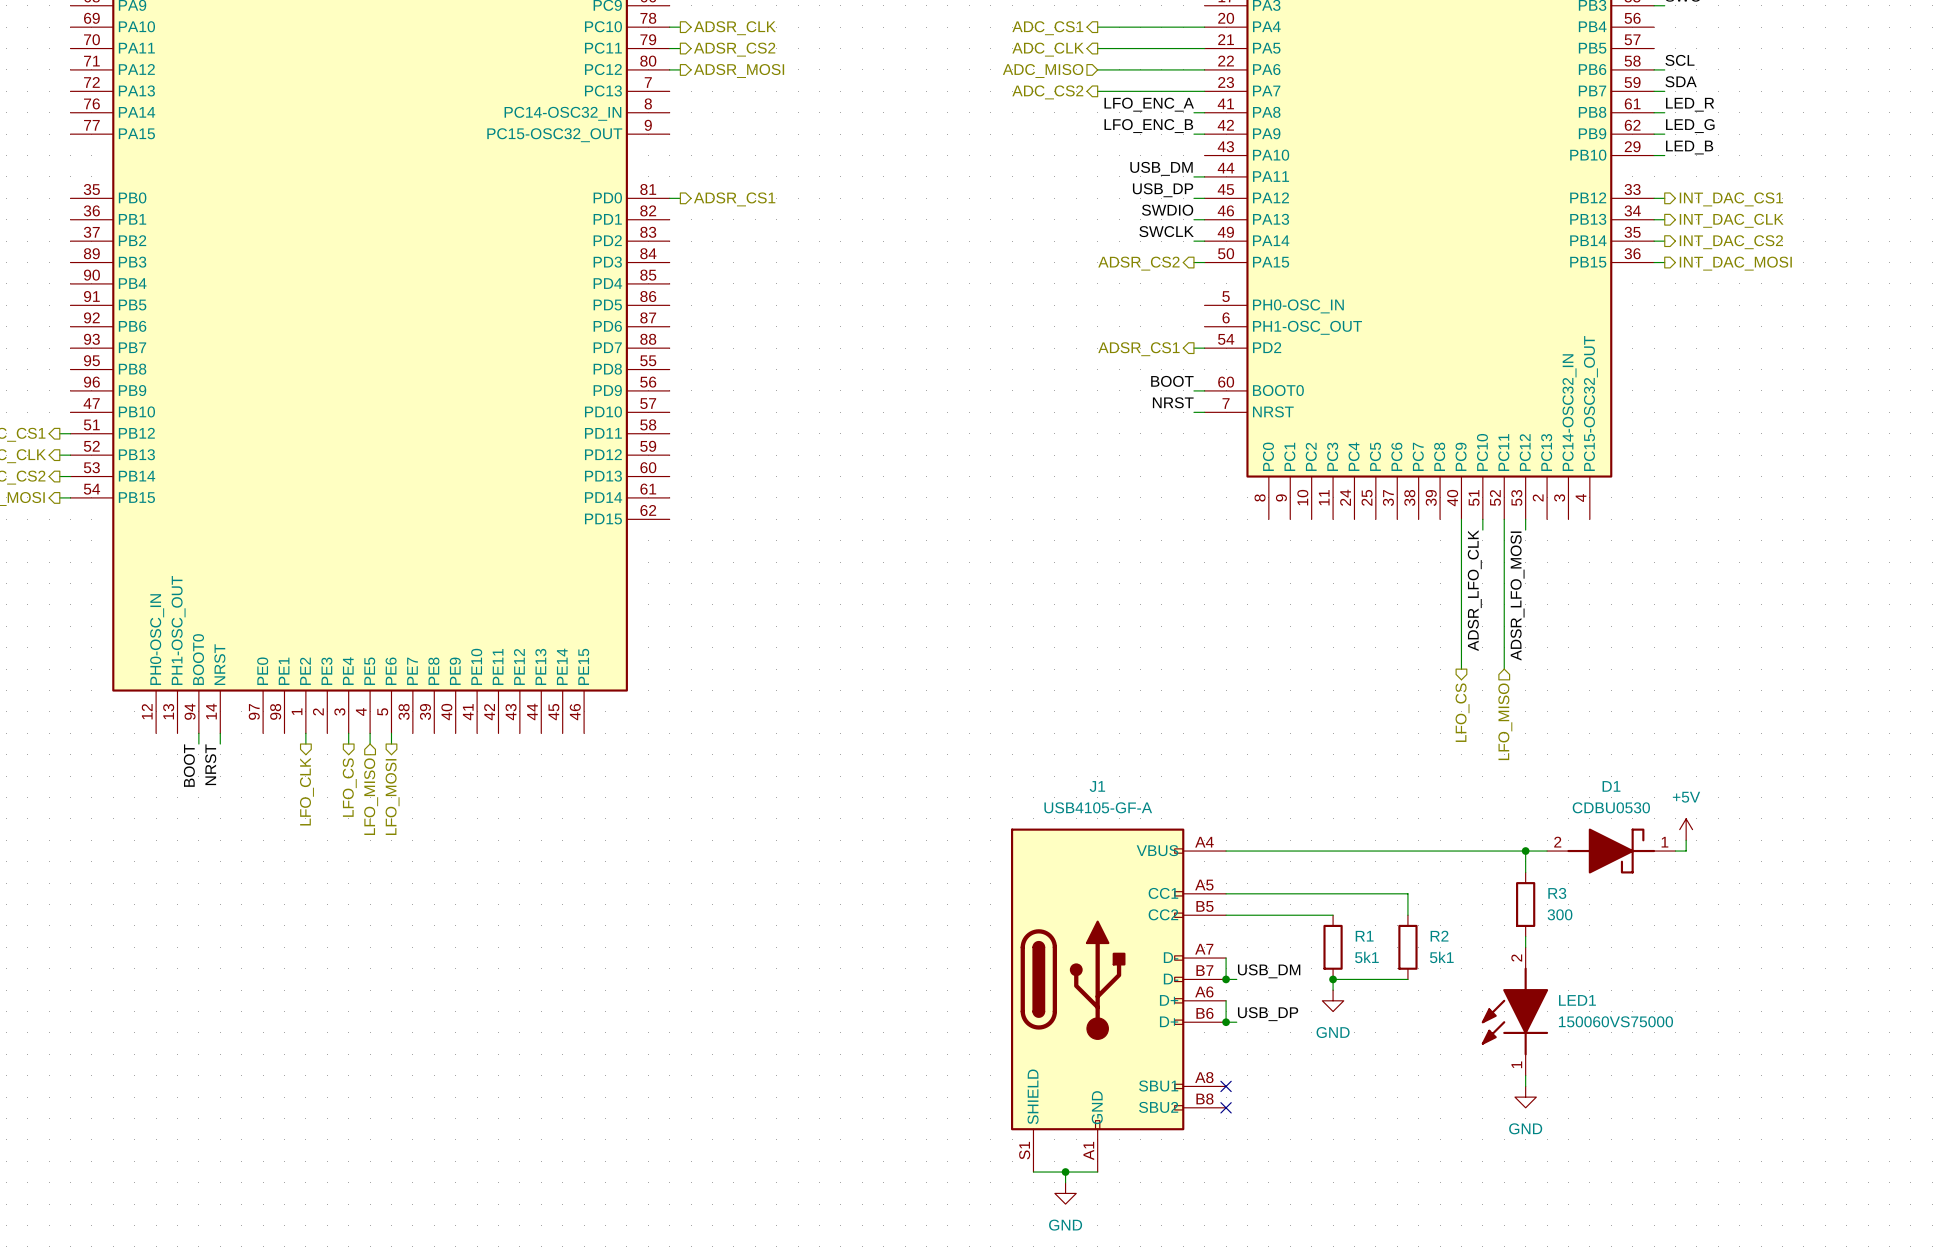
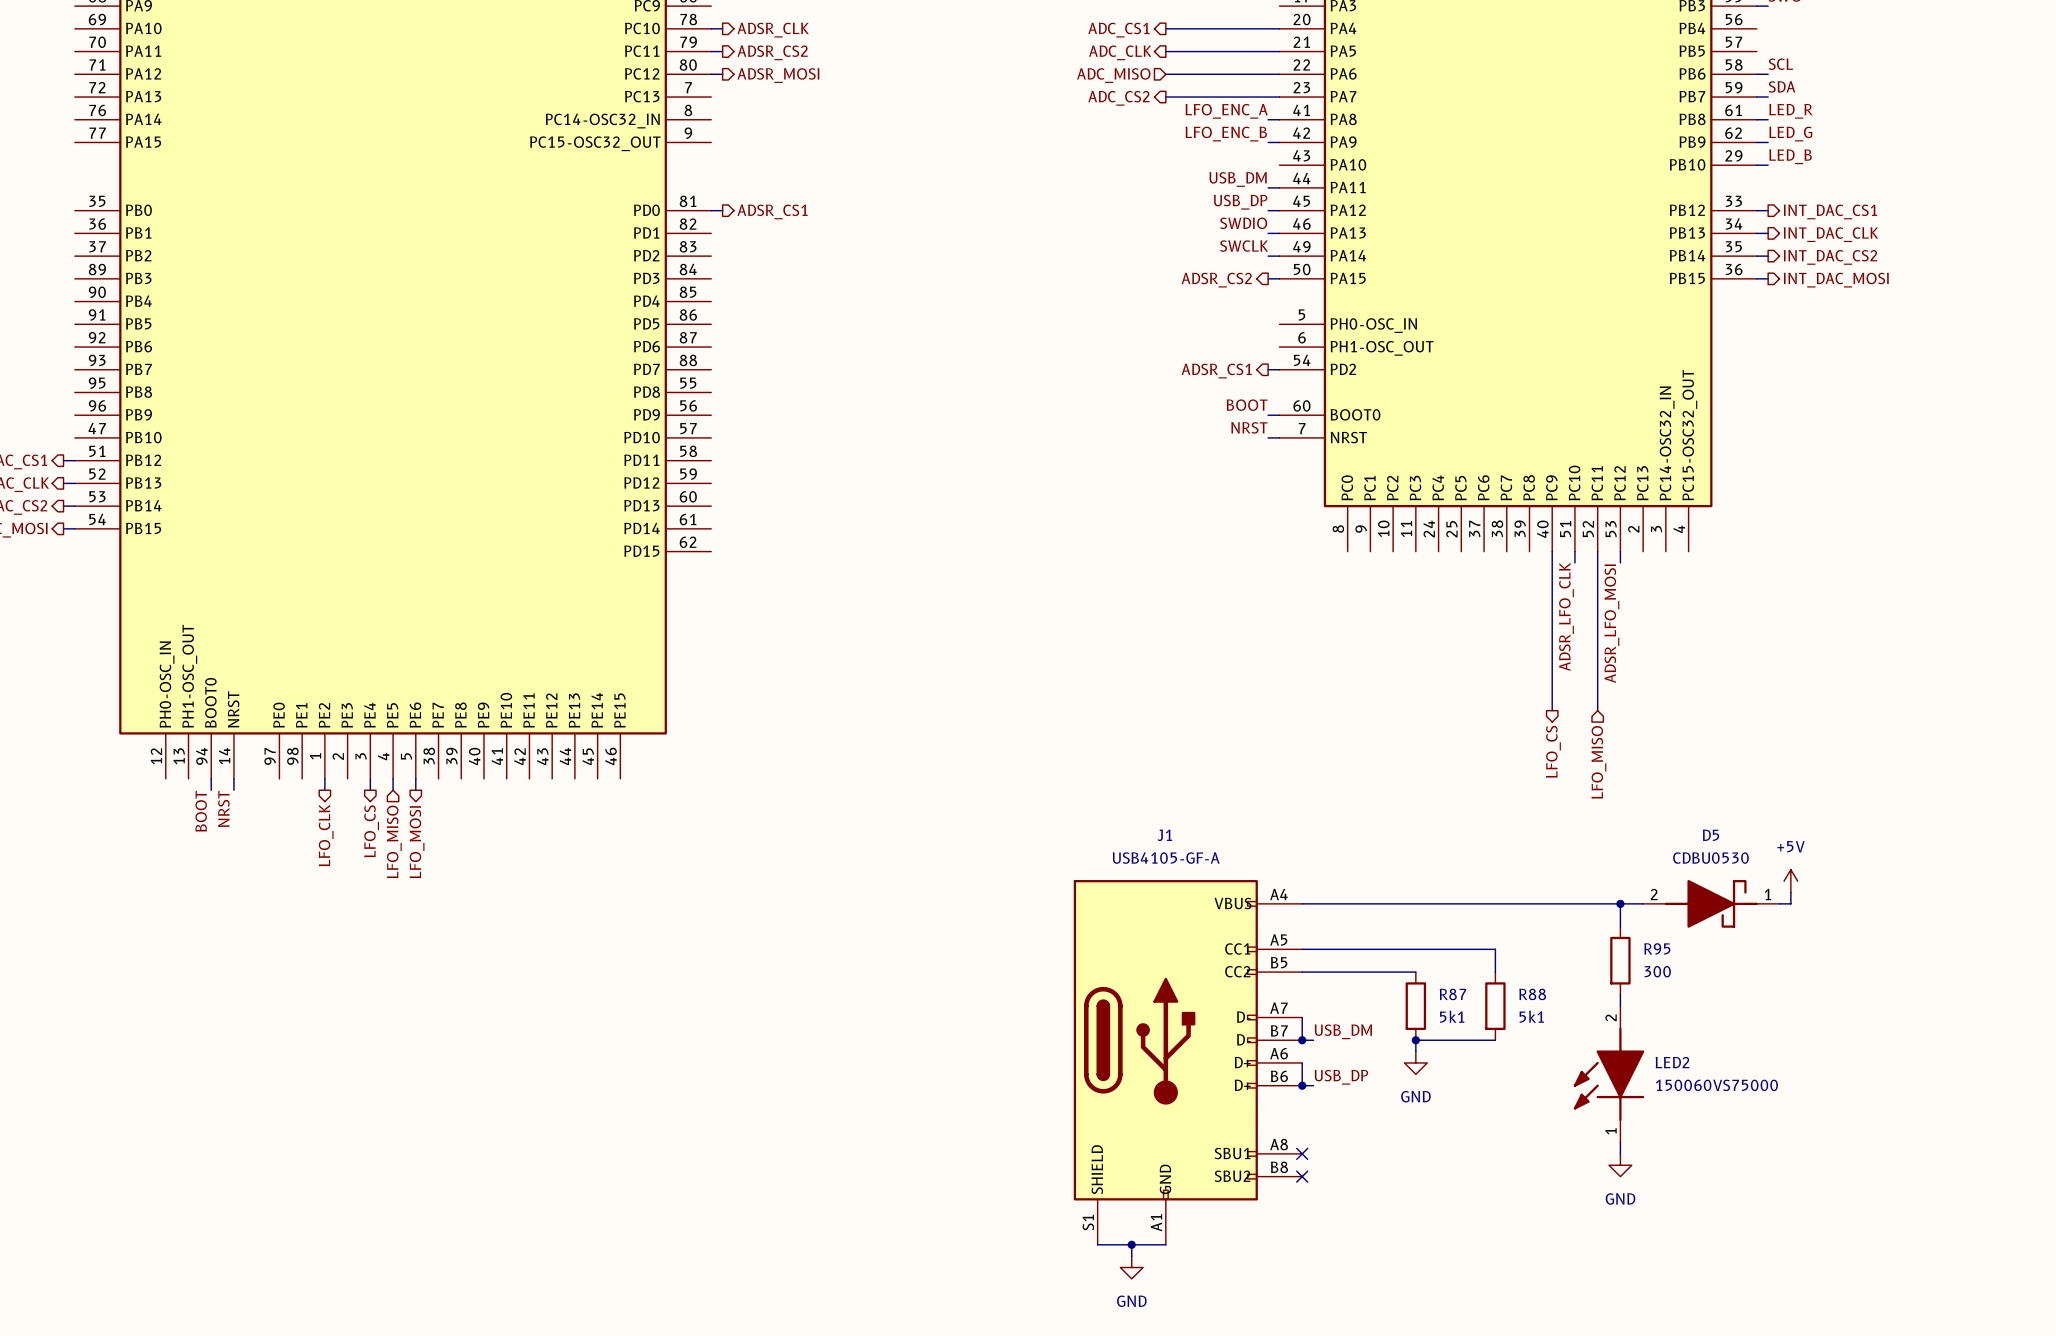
D1 name: D1 (1611, 786) -> D5 (1711, 835)
R3 name: R3 (1557, 893) -> R95 (1657, 948)
R1 name: R1 (1364, 936) -> R87 (1452, 994)
R2 name: R2 (1439, 936) -> R88 (1532, 994)
LED1 name: LED1 (1577, 1000) -> LED2 (1672, 1062)

